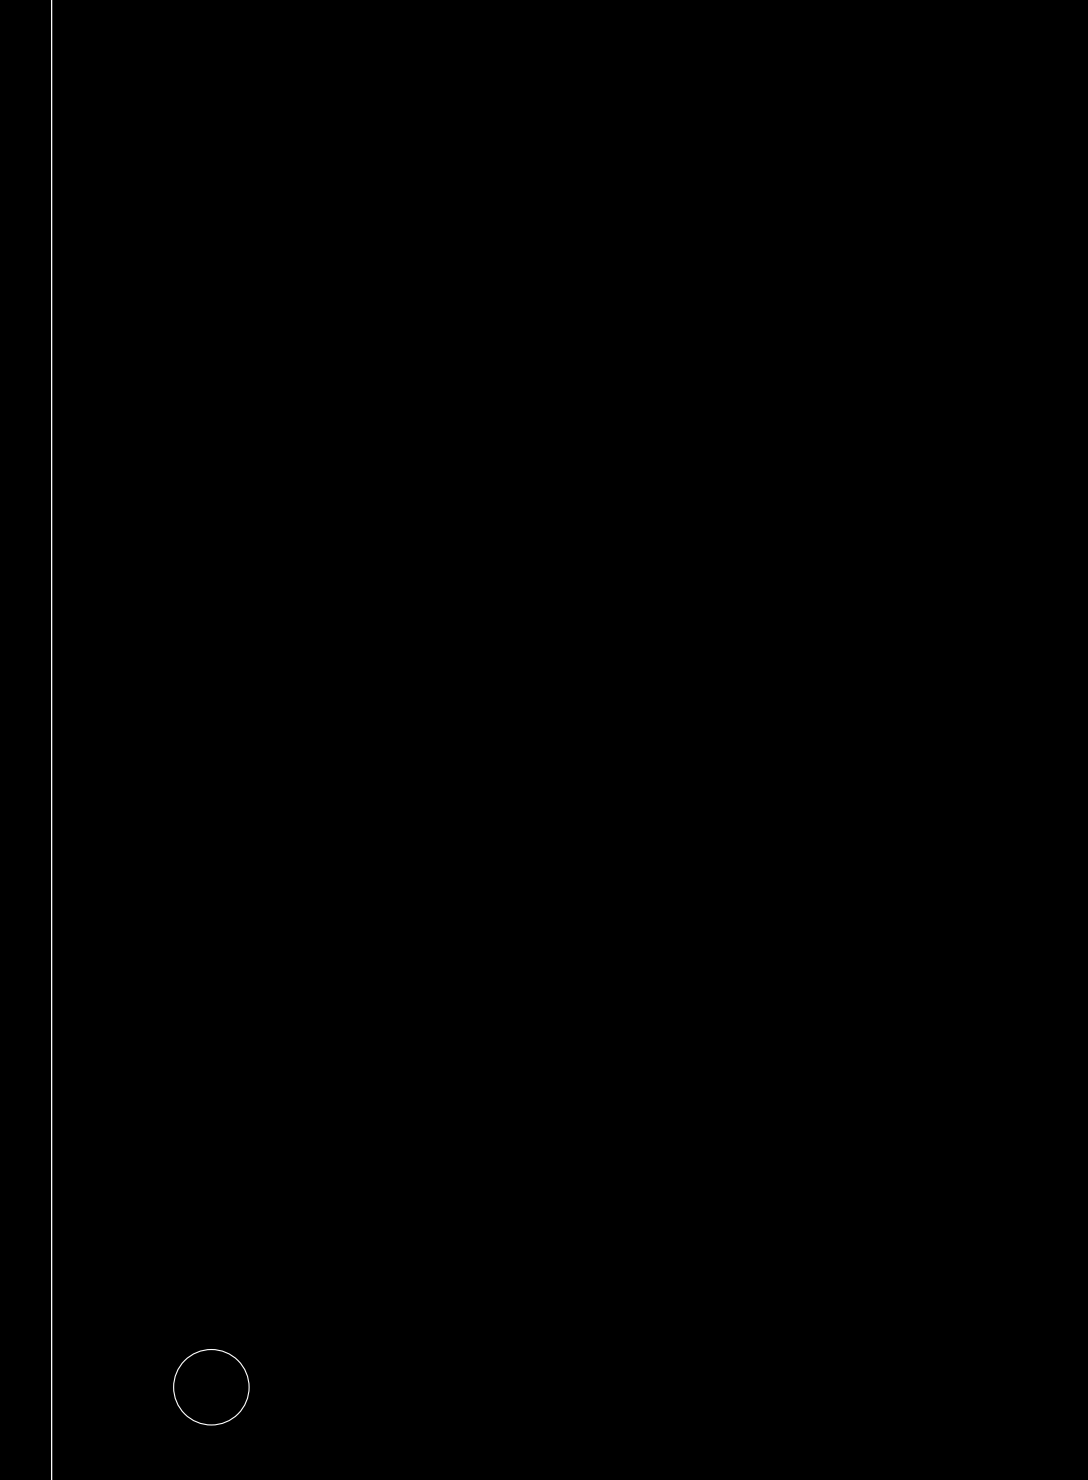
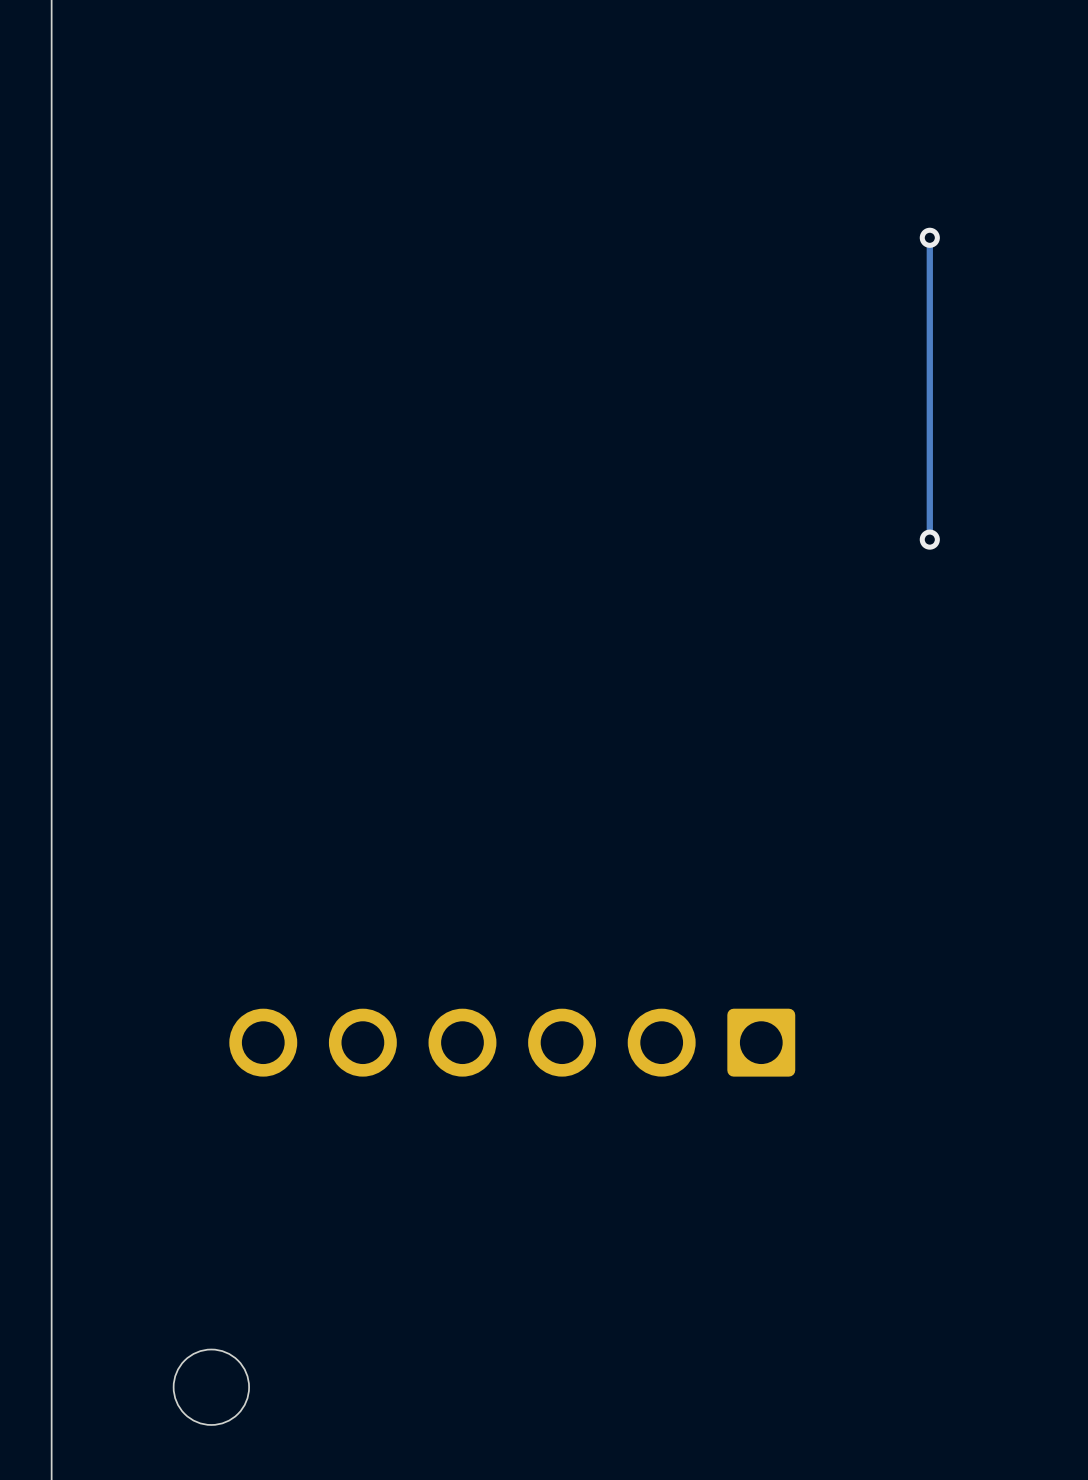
track: none -> (929, 237) (929, 539)
via: none -> (929, 237)
via: none -> (929, 539)
part: none -> (512, 1042)

